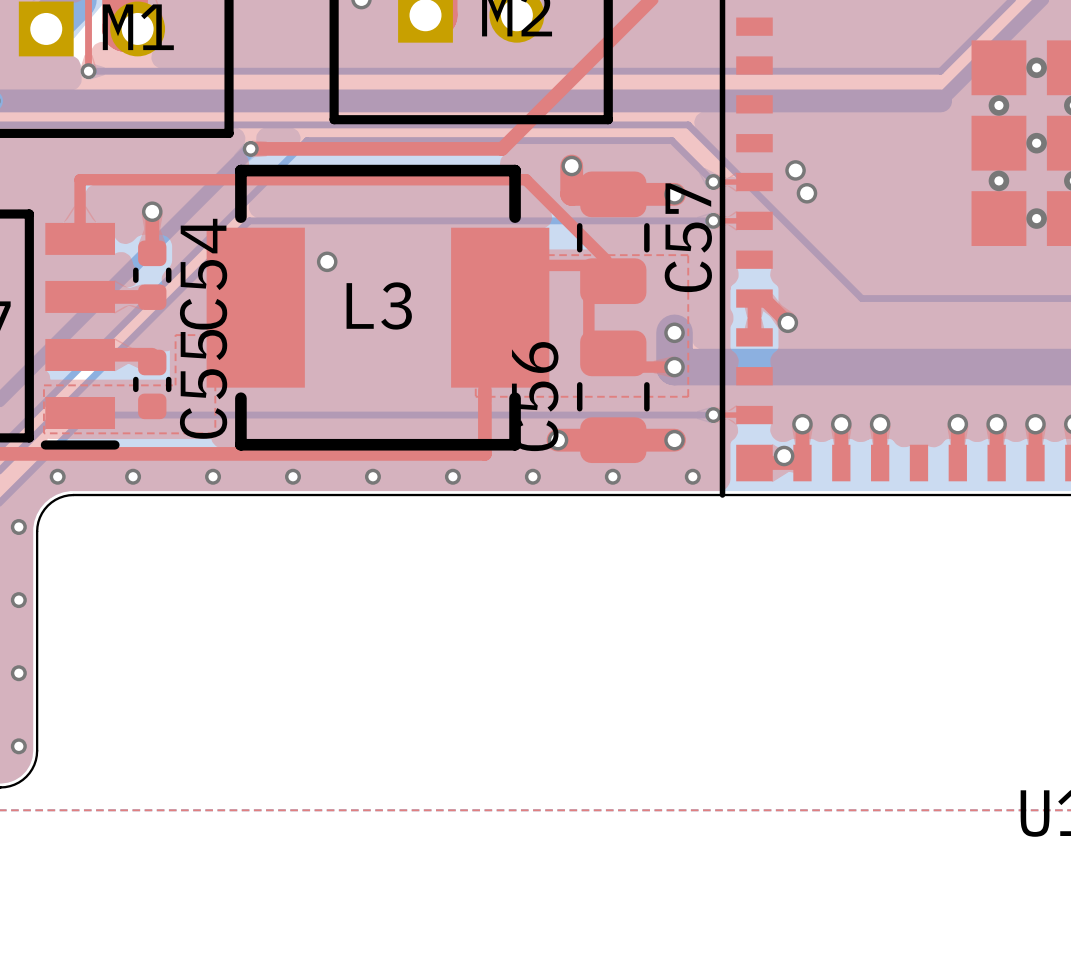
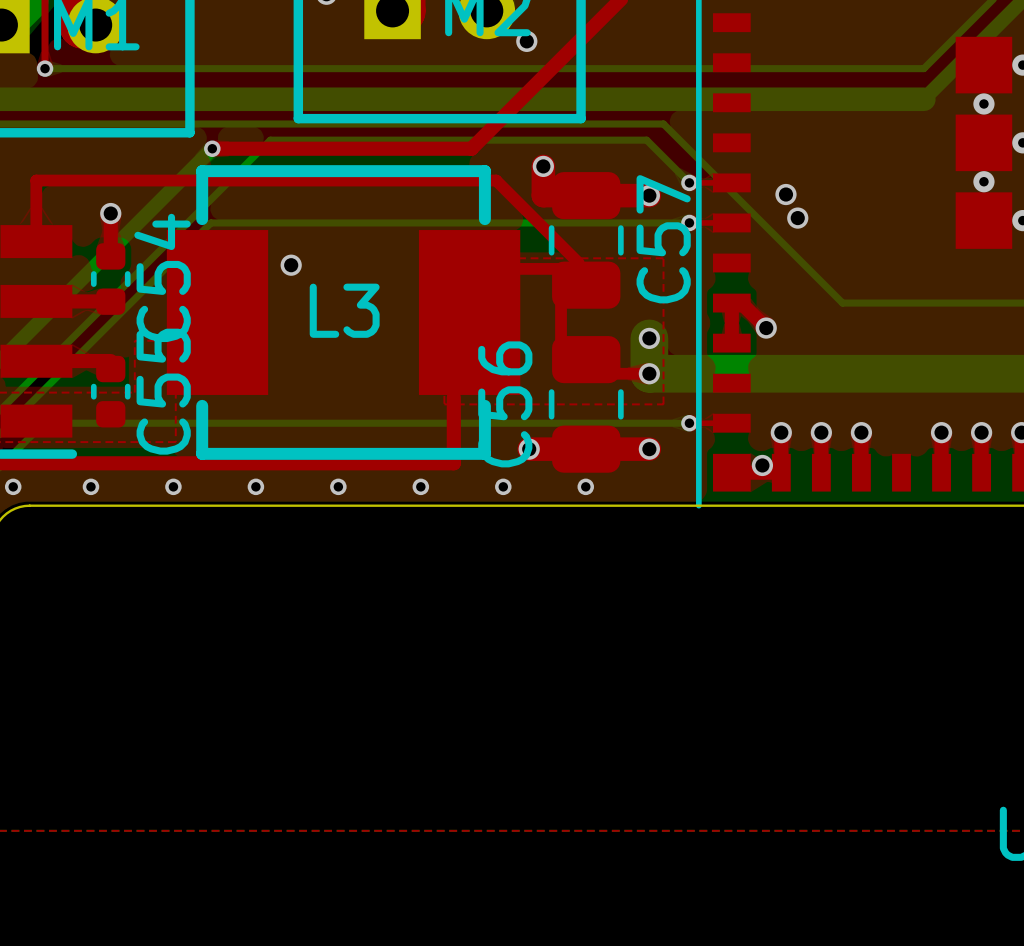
via: none -> (526, 41)
via position: (795, 170) -> (797, 218)
via: (692, 476) -> none

